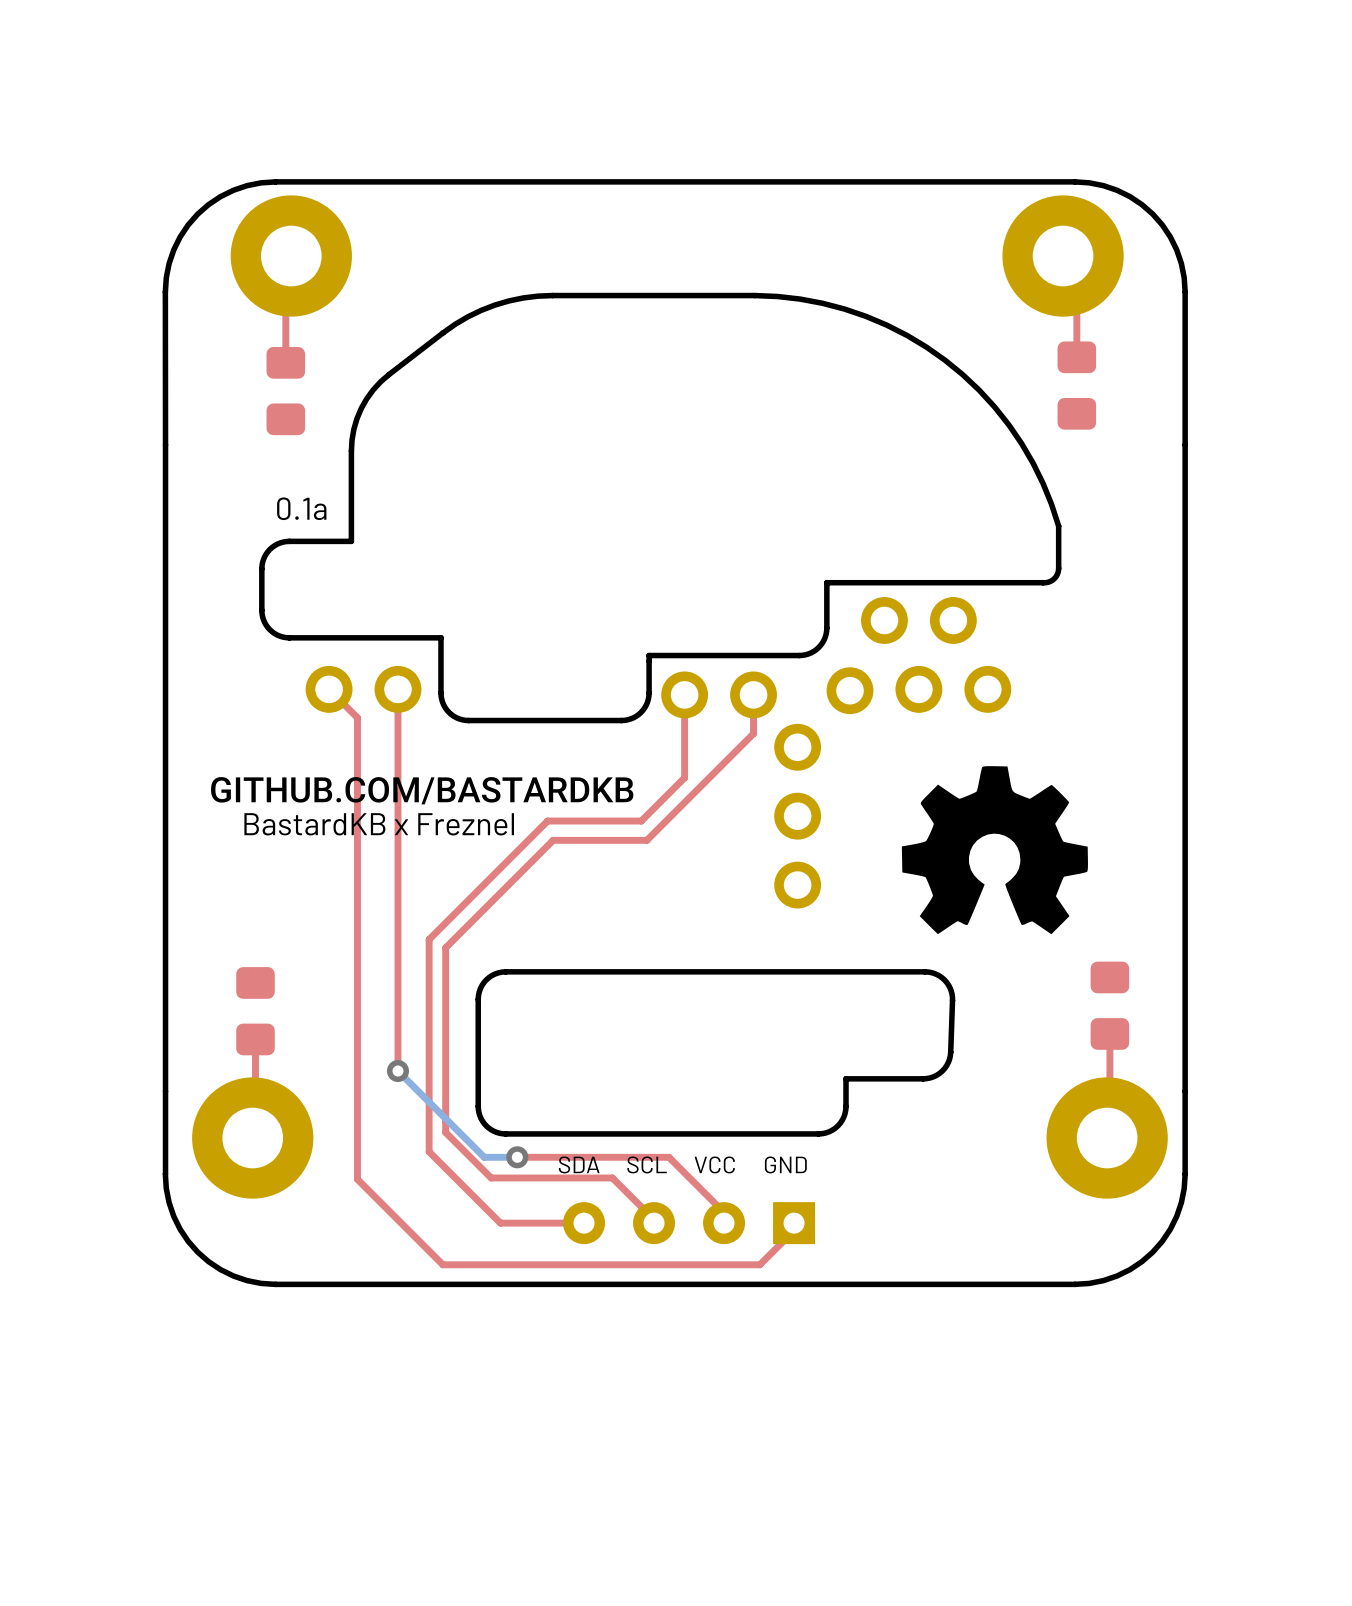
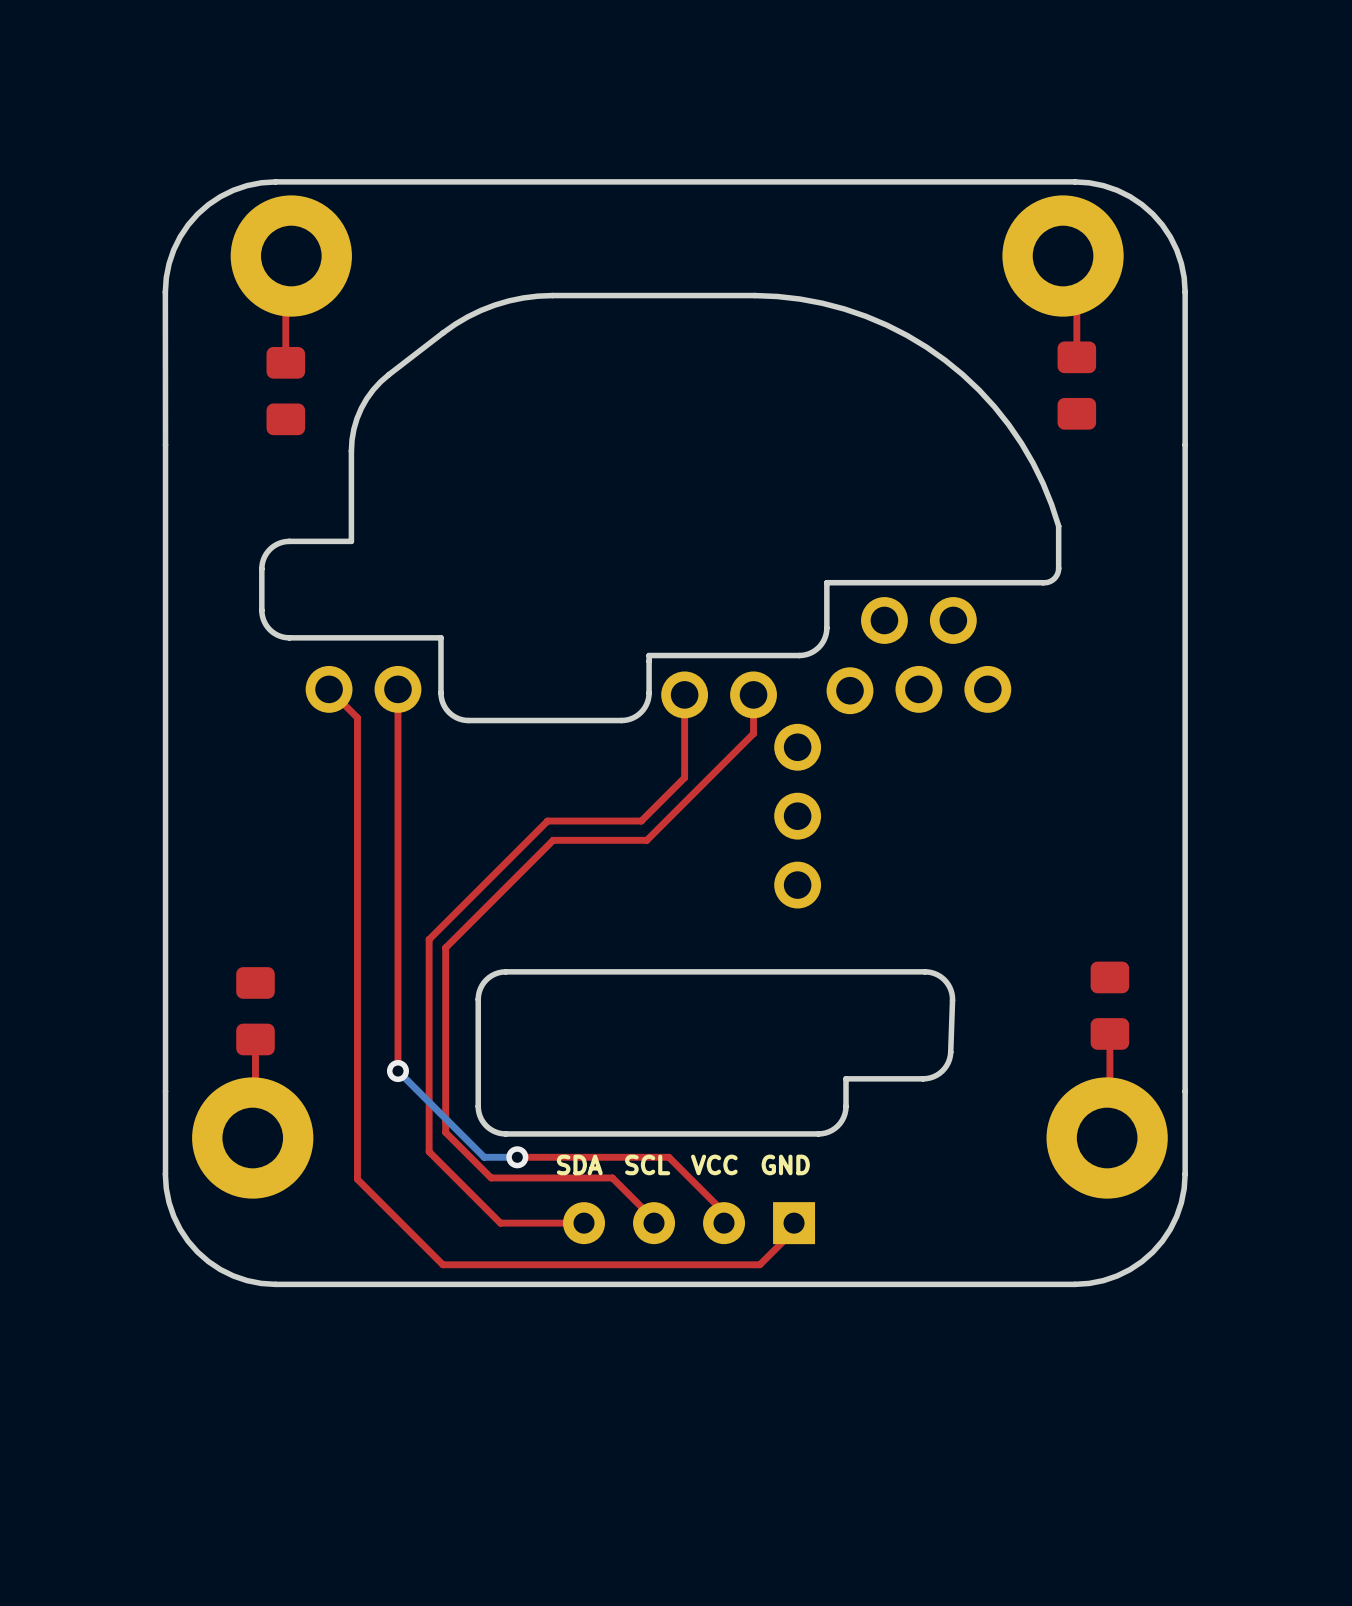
text: 0.1a (301, 508) -> none
drawing: [901, 766, 1088, 935] -> none
drawing: [211, 777, 634, 805] -> none
text: BastardKB x Freznel (379, 824) -> none

